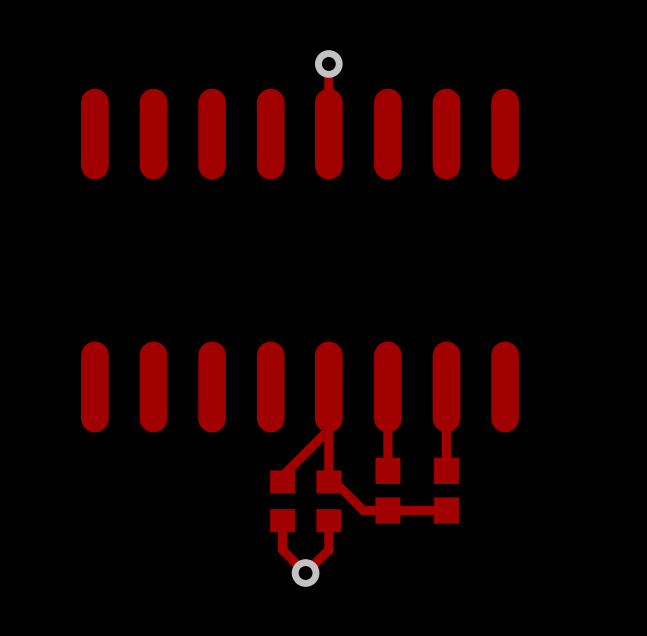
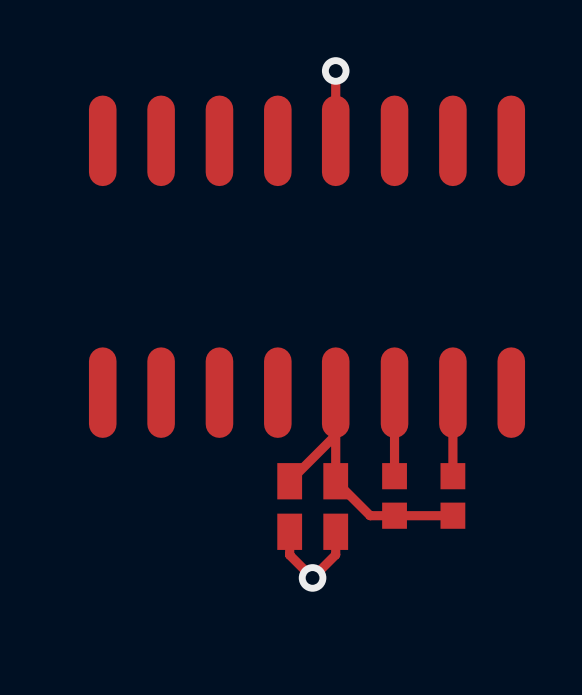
part footprint: [270, 470, 296, 533] -> [277, 463, 303, 550]
part footprint: [316, 470, 342, 533] -> [323, 463, 349, 550]

